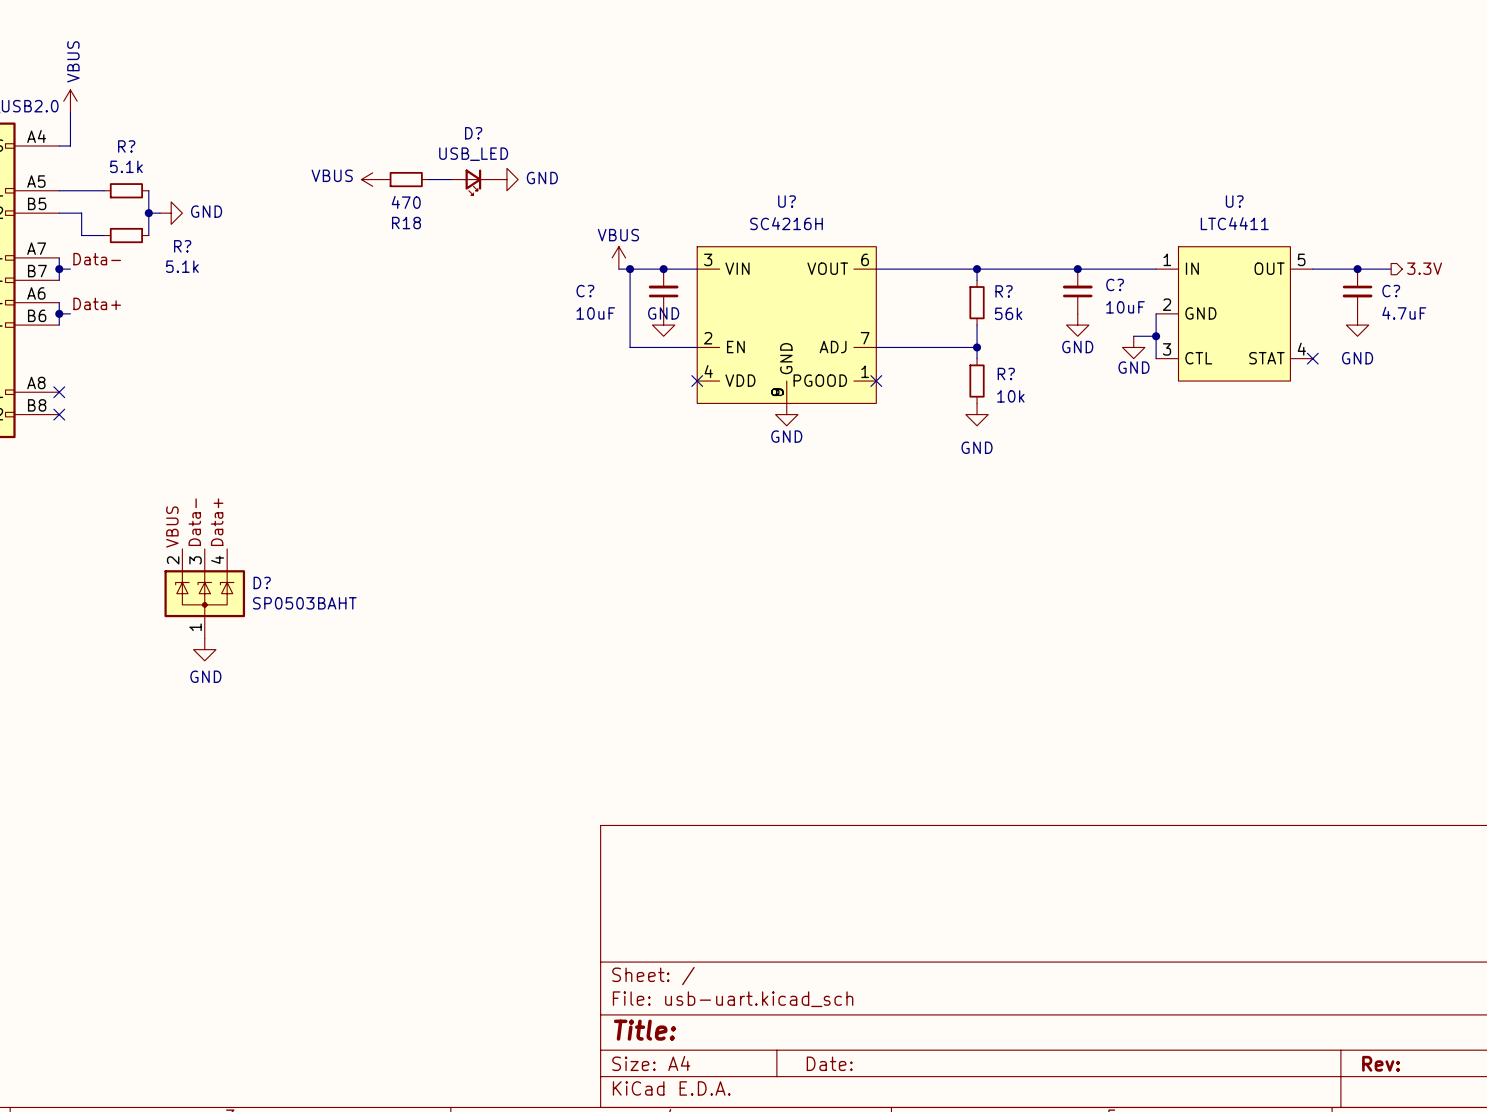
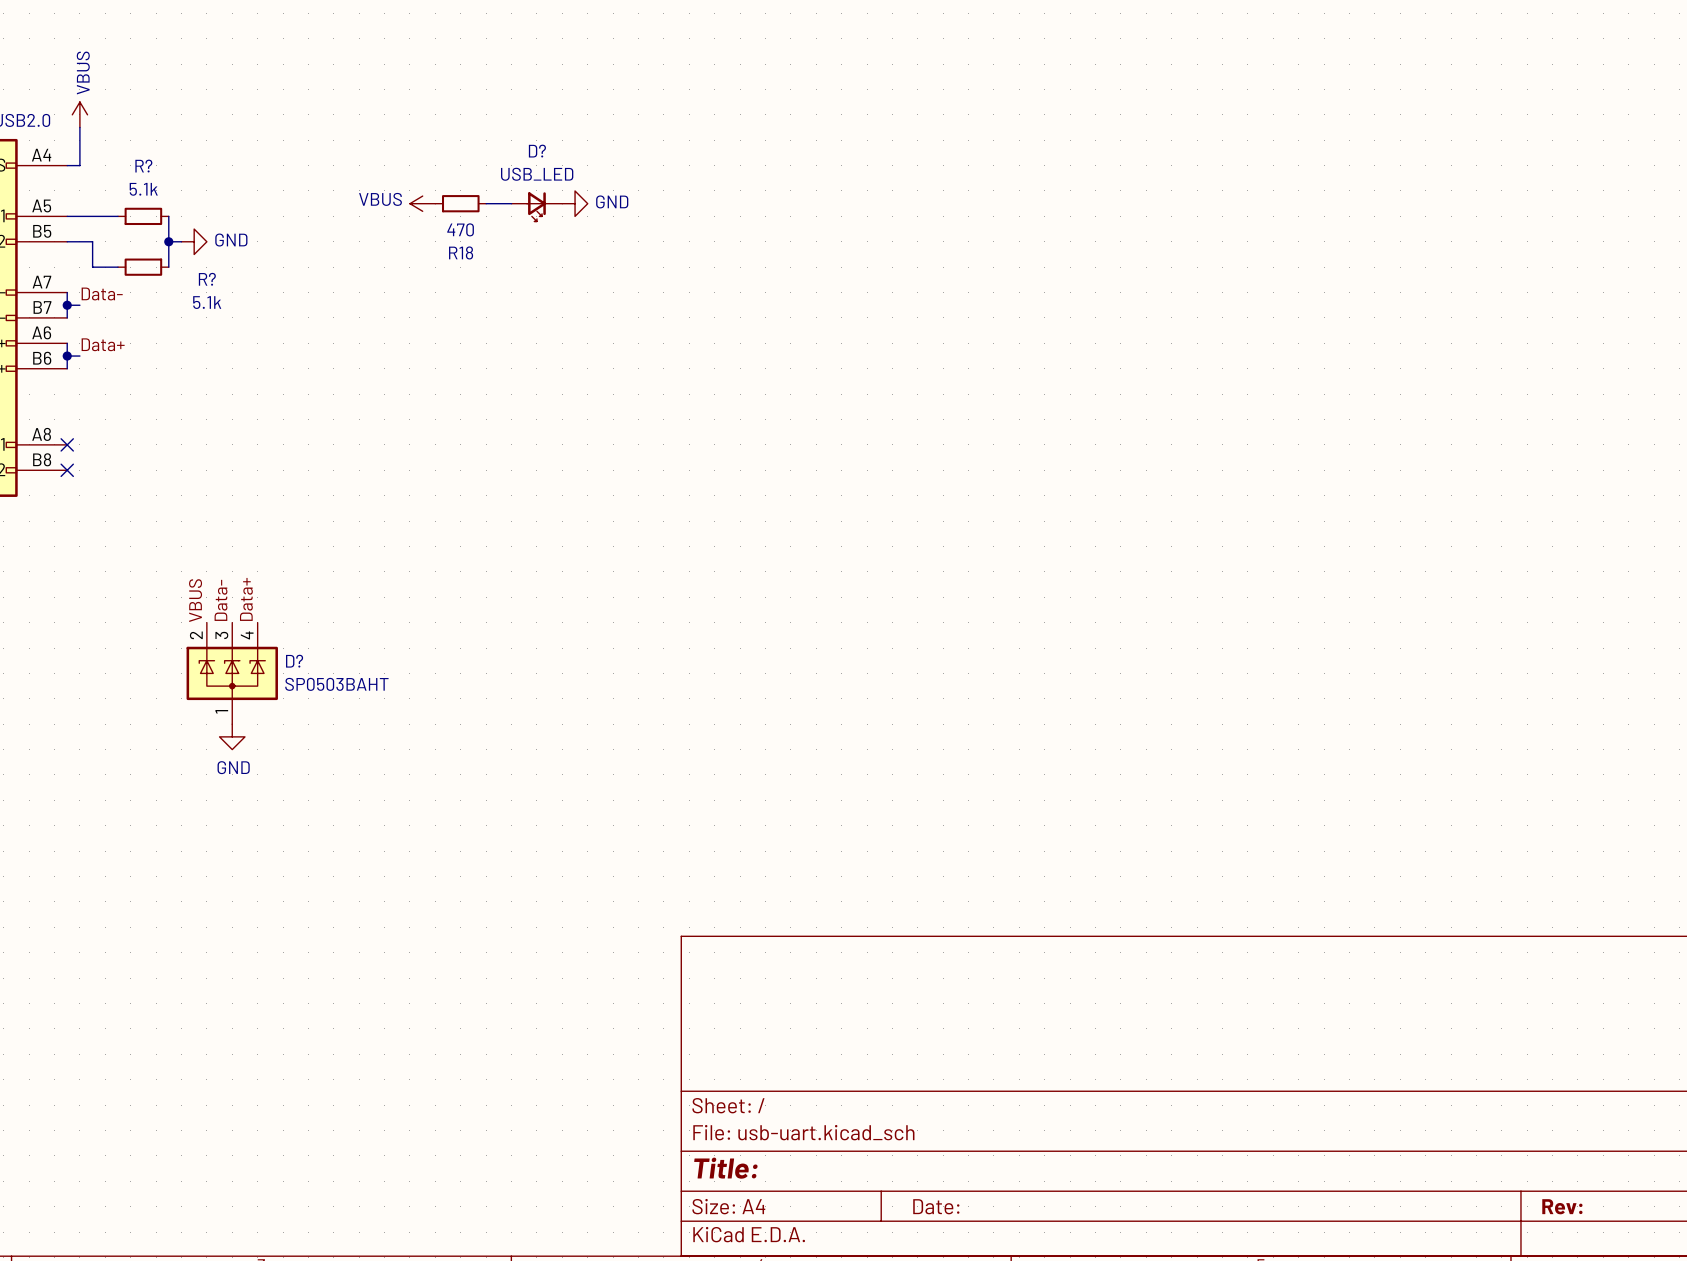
power symbol: VBUS (618, 257) -> none
hierarchical label: 3.3V (1424, 268) -> none
wire: (618, 269) (697, 269) -> none
wire: (630, 269) (630, 347) (697, 347) -> none
junction: (630, 269) -> none
junction: (663, 269) -> none
wire: (876, 269) (1156, 269) -> none
wire: (977, 269) (977, 280) -> none
junction: (977, 269) -> none
junction: (1077, 269) -> none
wire: (1312, 269) (1391, 269) -> none
junction: (1357, 269) -> none
C?: 10uF (663, 291) -> none
C?: 10uF (1077, 291) -> none
C?: 4.7uF (1357, 291) -> none
R?: 56k (977, 302) -> none
wire: (1156, 313) (1156, 358) -> none
U?: LTC4411 (1234, 313) -> none
power symbol: GND (663, 325) -> none
U?: SC4216H (786, 325) -> none
wire: (977, 325) (977, 358) -> none
power symbol: GND (1077, 325) -> none
power symbol: GND (1357, 325) -> none
wire: (1133, 336) (1156, 336) -> none
junction: (1156, 336) -> none
wire: (876, 347) (977, 347) -> none
junction: (977, 347) -> none
power symbol: GND (1133, 347) -> none
no-connect mark: (1312, 358) -> none
no-connect mark: (697, 381) -> none
no-connect mark: (876, 381) -> none
R?: 10k (977, 381) -> none
power symbol: GND (786, 414) -> none
power symbol: GND (977, 414) -> none

